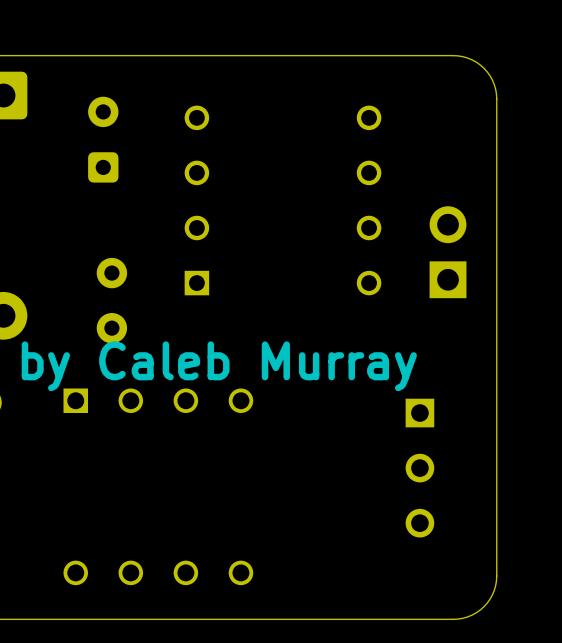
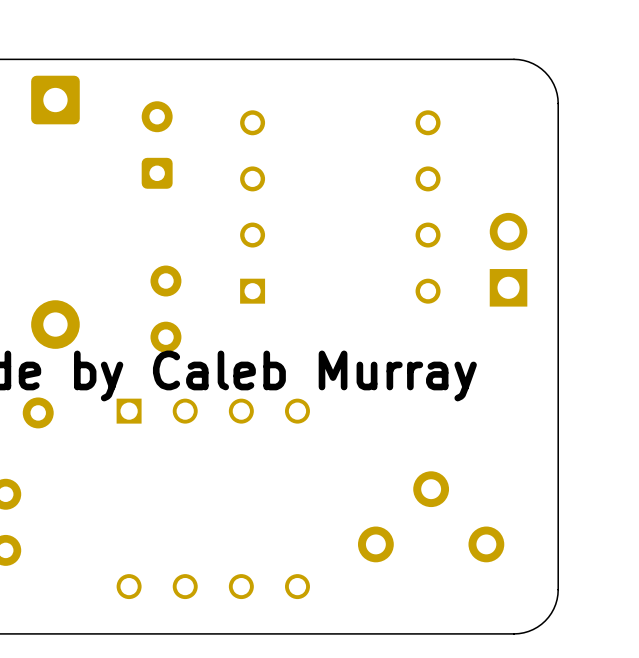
part: (419, 468) -> none
part: none -> (431, 516)

